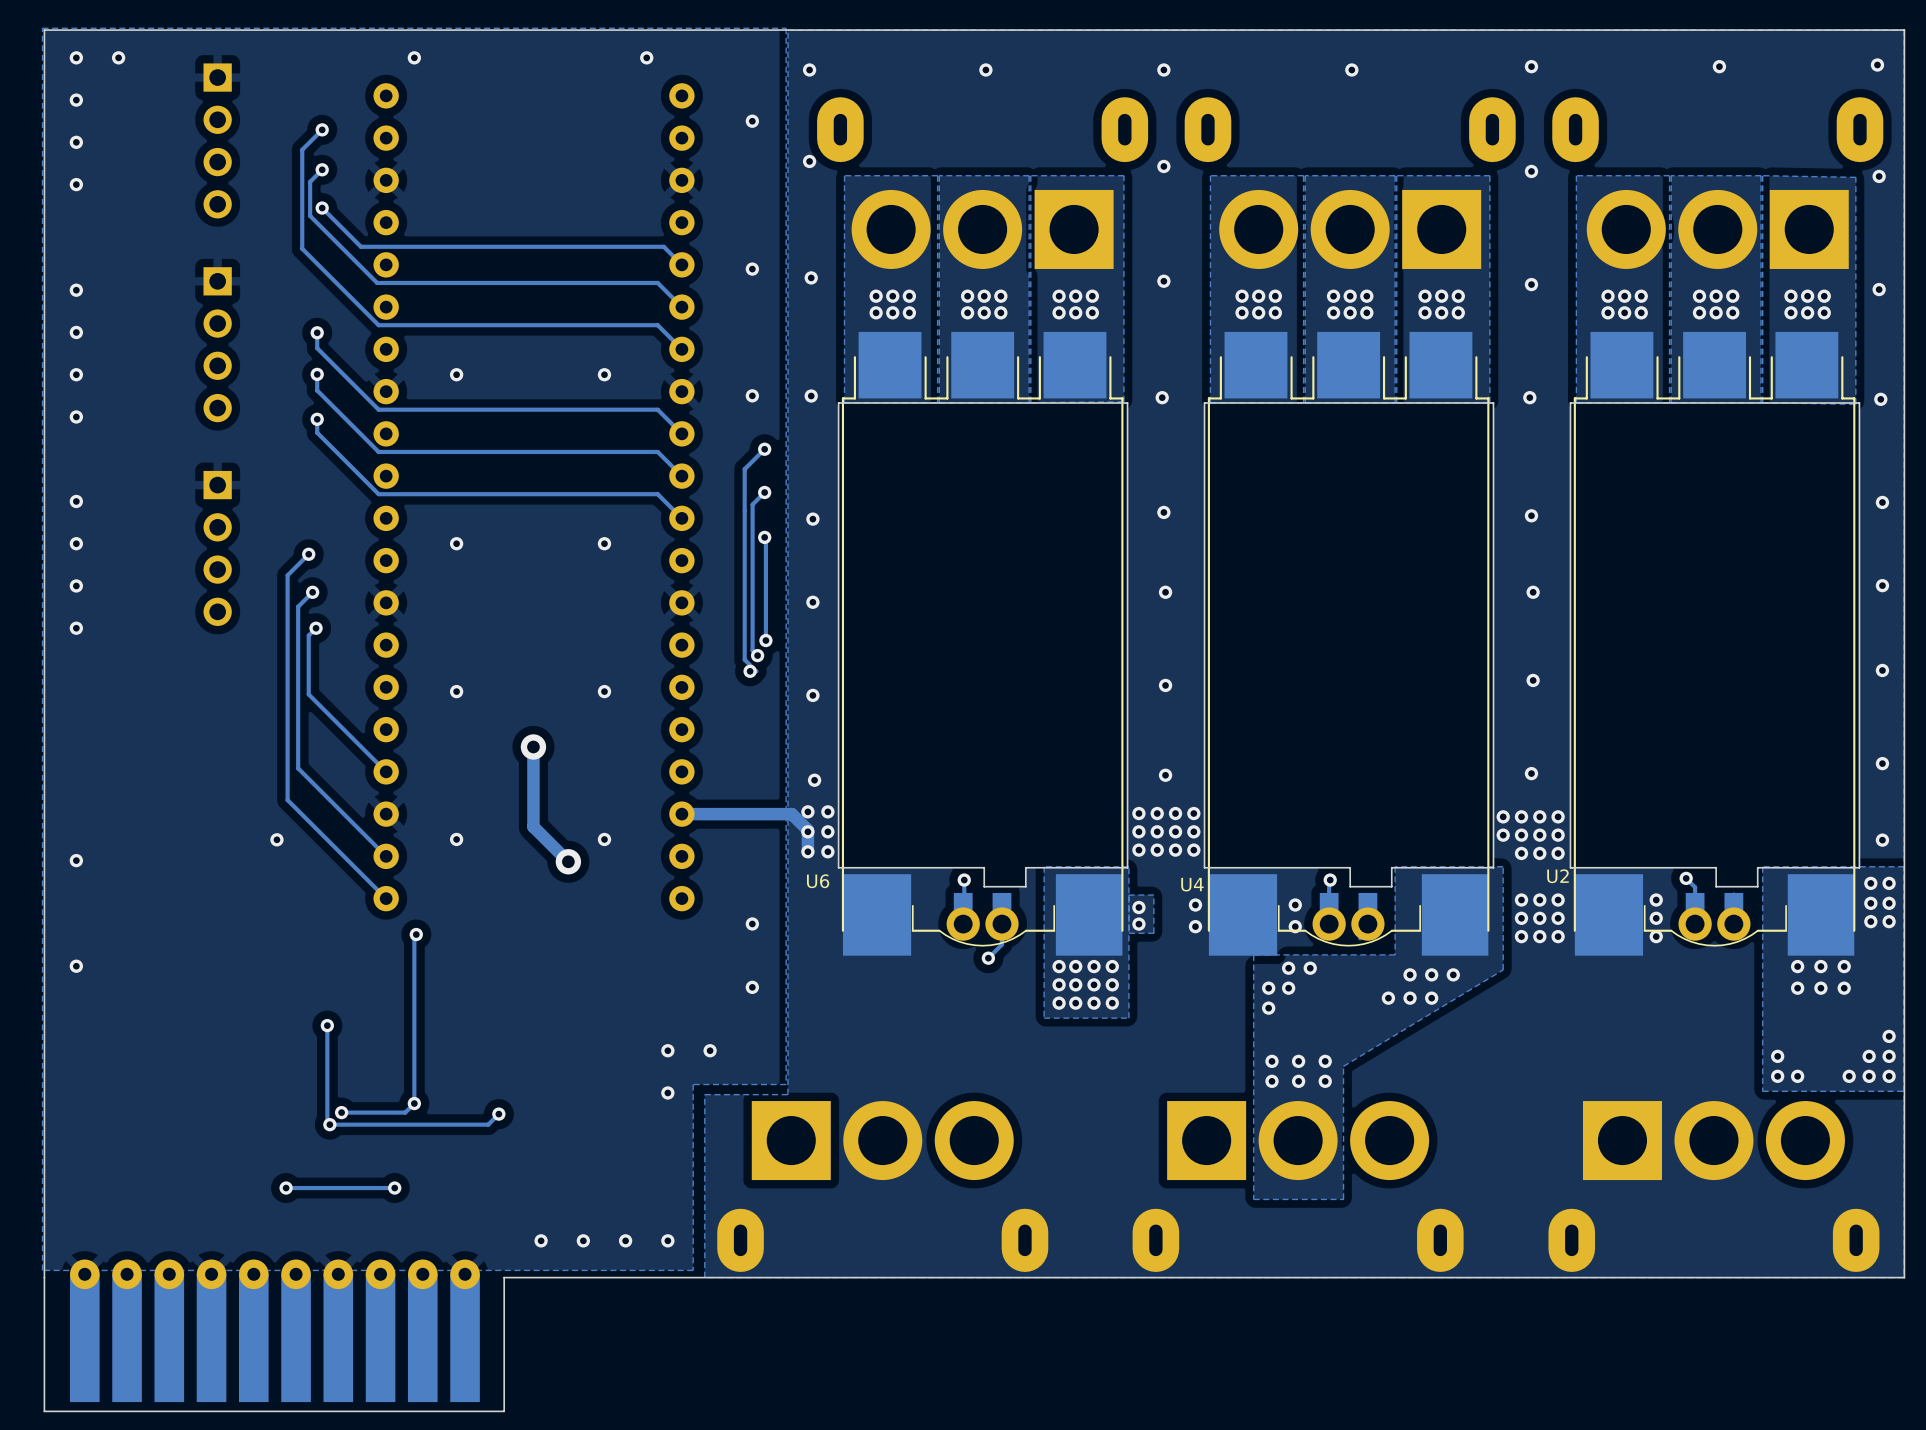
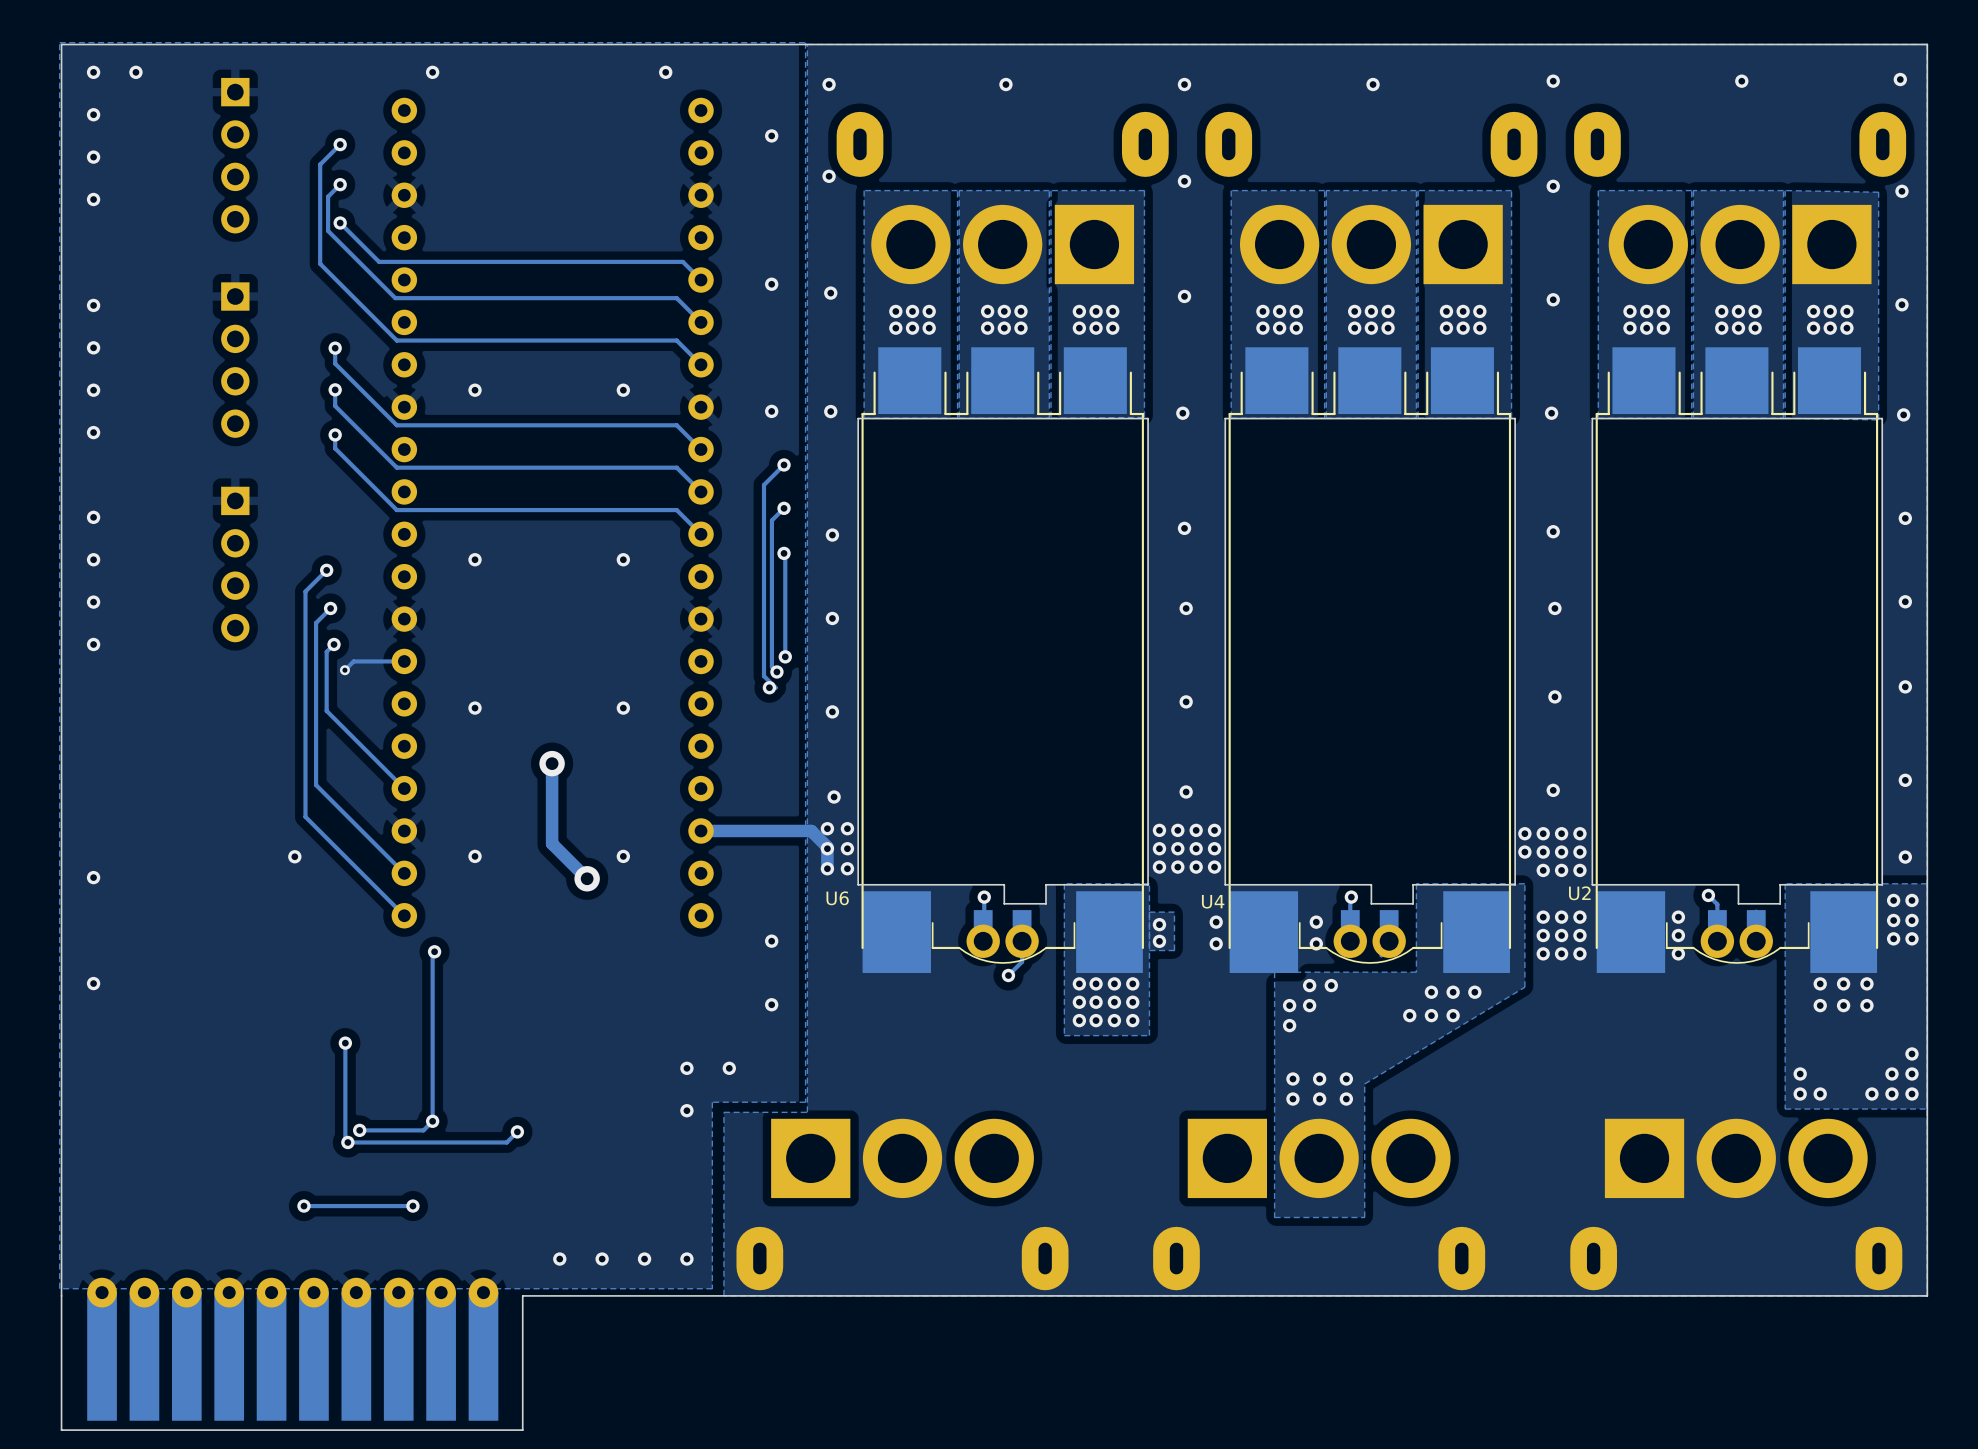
track: none -> (404, 661) (353, 661) (344, 670)
via: none -> (344, 670)

